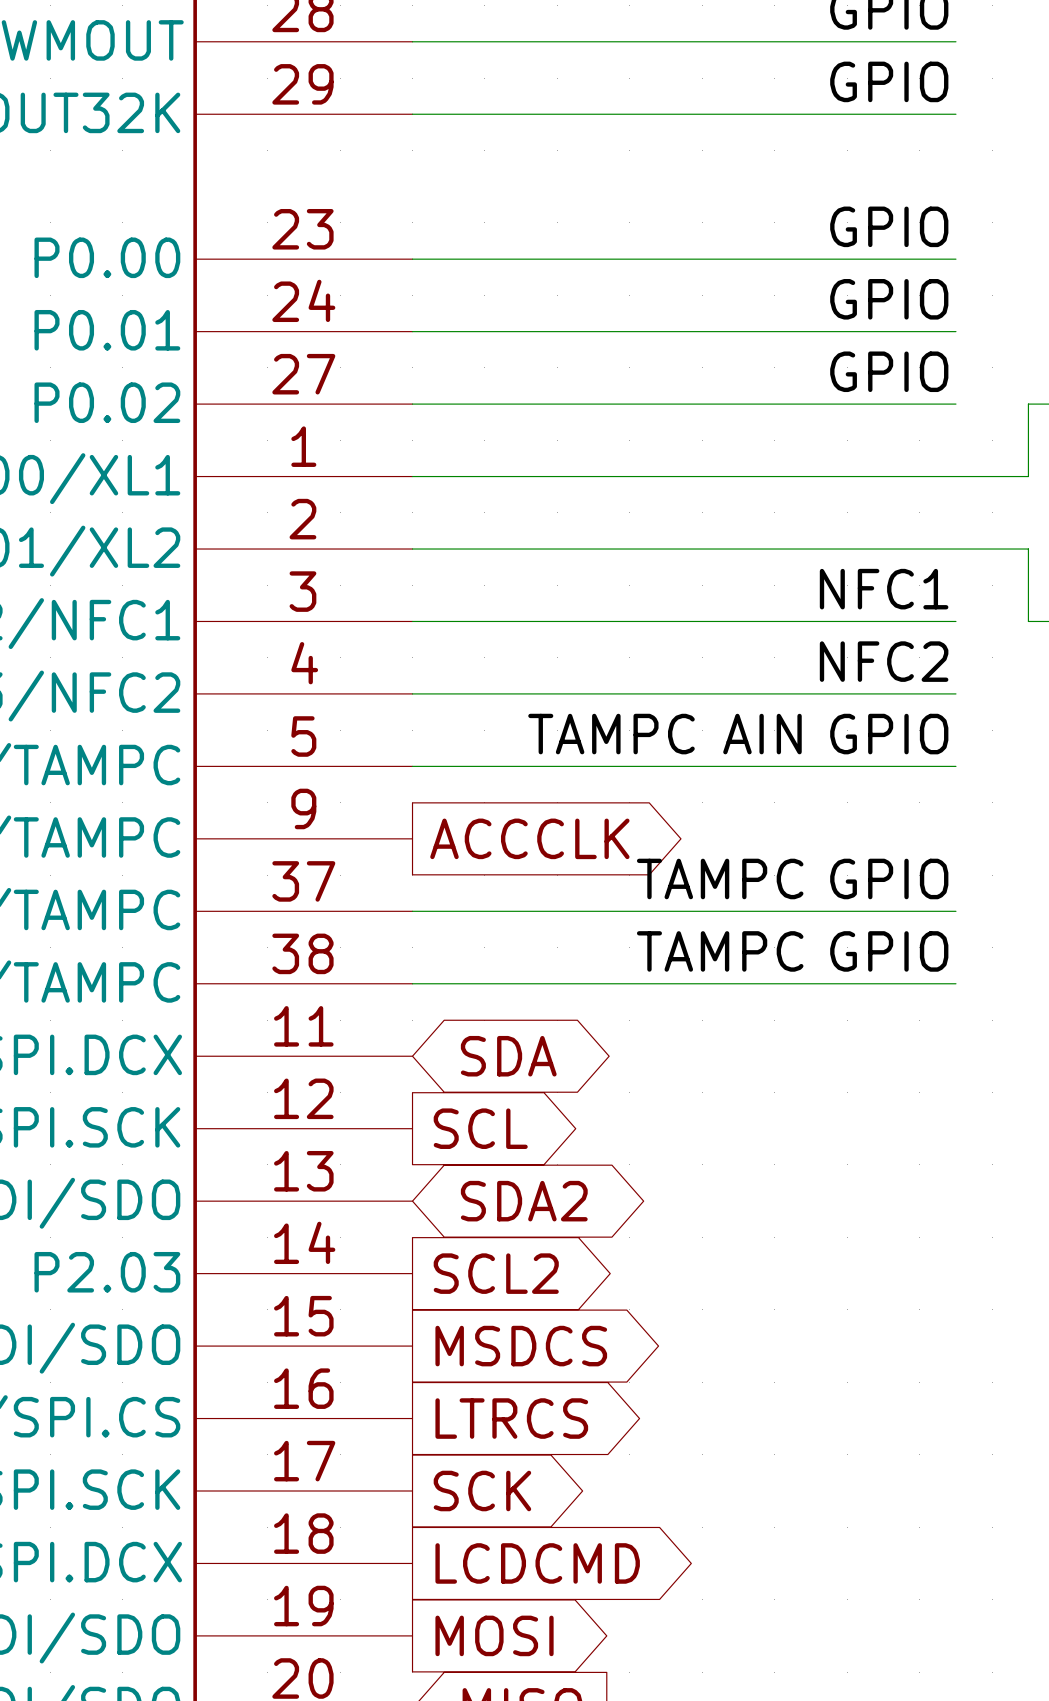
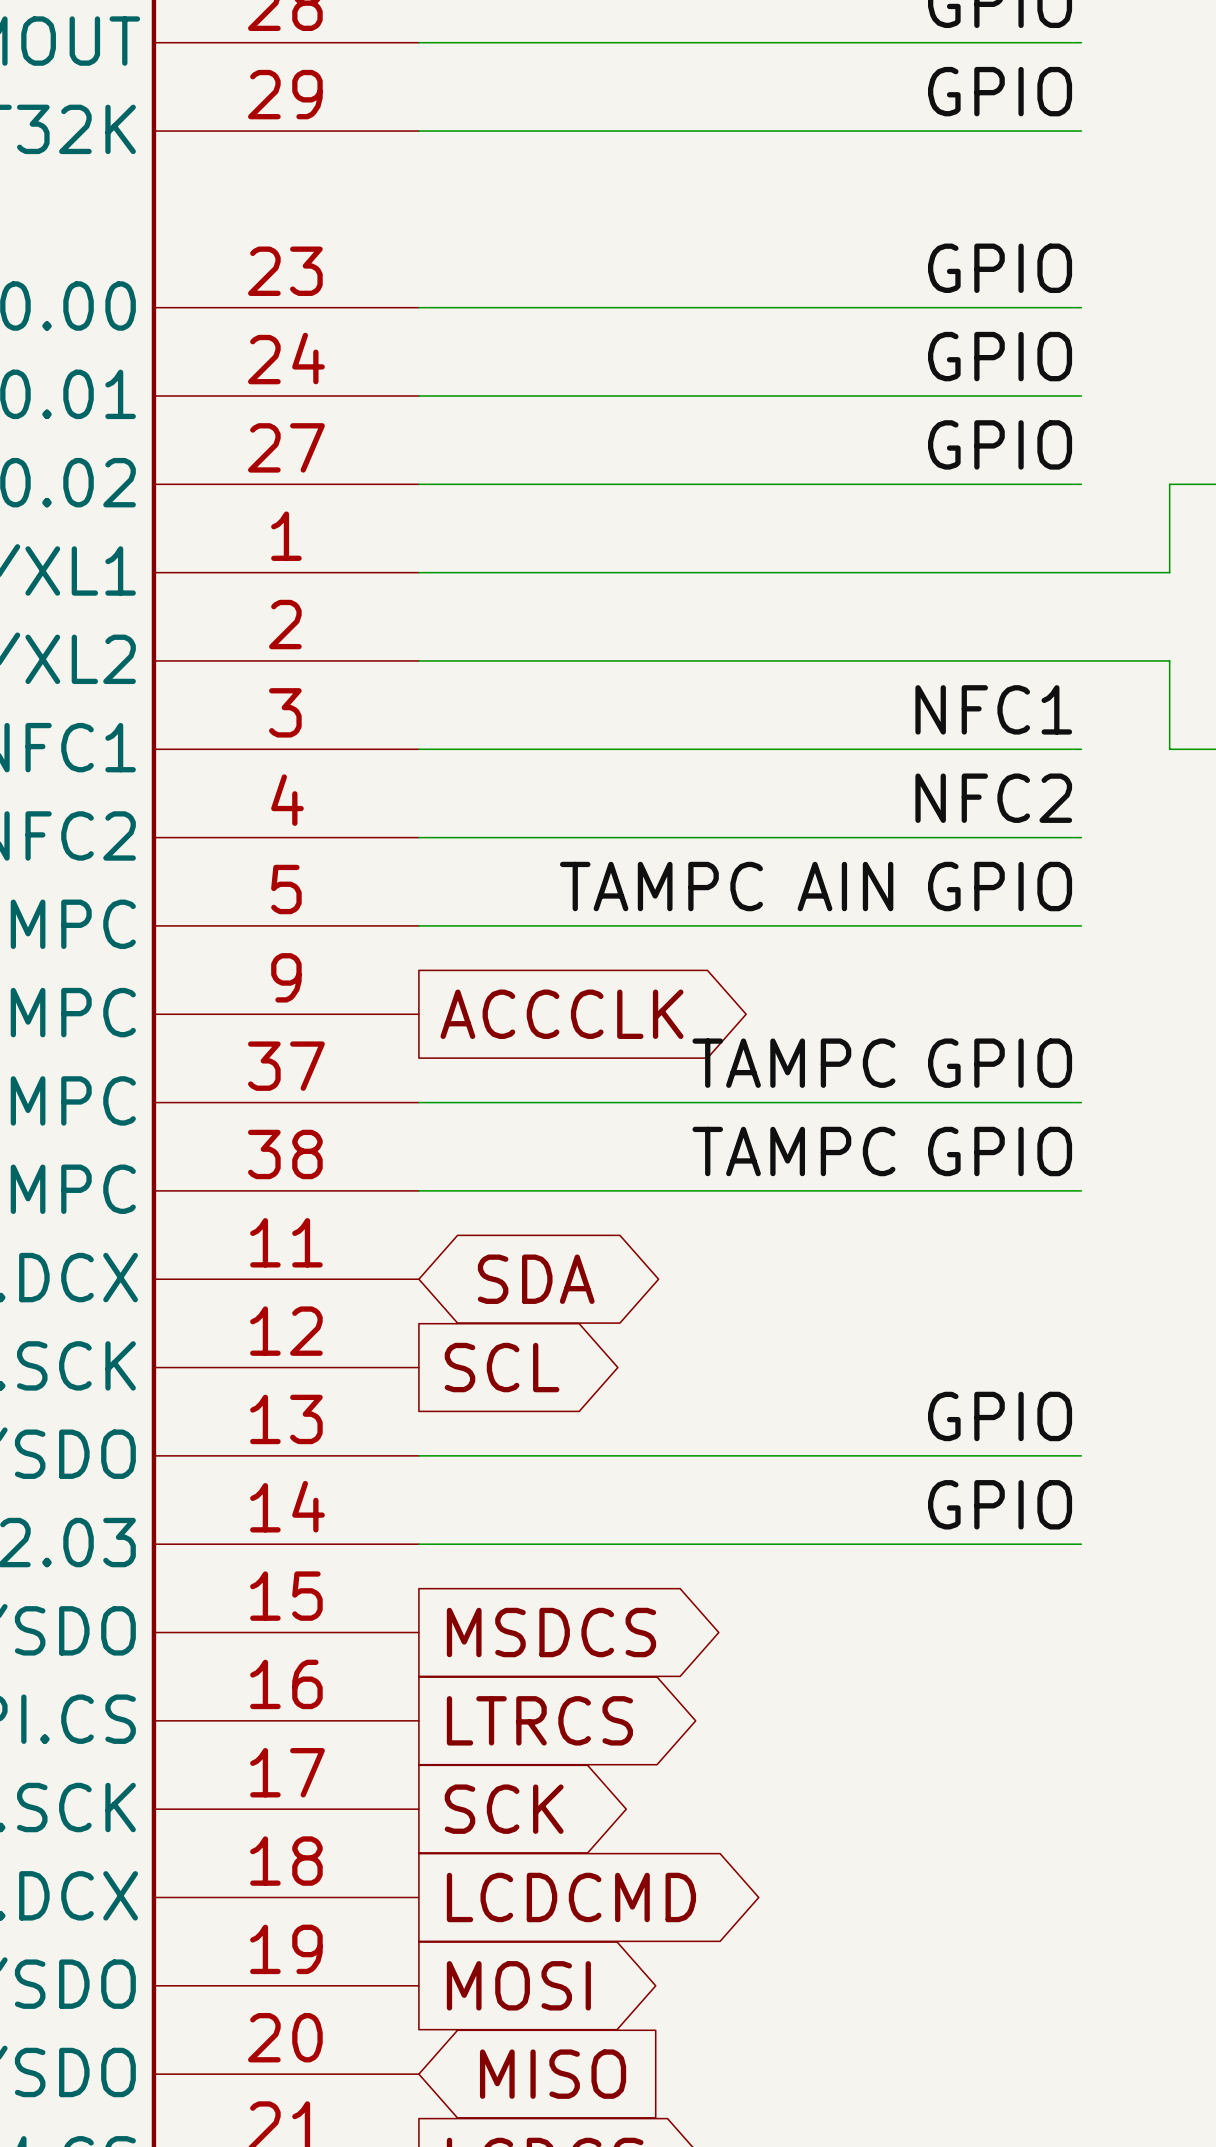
label: none -> GPIO (1000, 1416)
wire: none -> (418, 1455) (1081, 1455)
global label: SDA2 (524, 1201) -> none
label: none -> GPIO (1000, 1504)
wire: none -> (418, 1544) (1081, 1544)
global label: SCL2 (496, 1273) -> none

